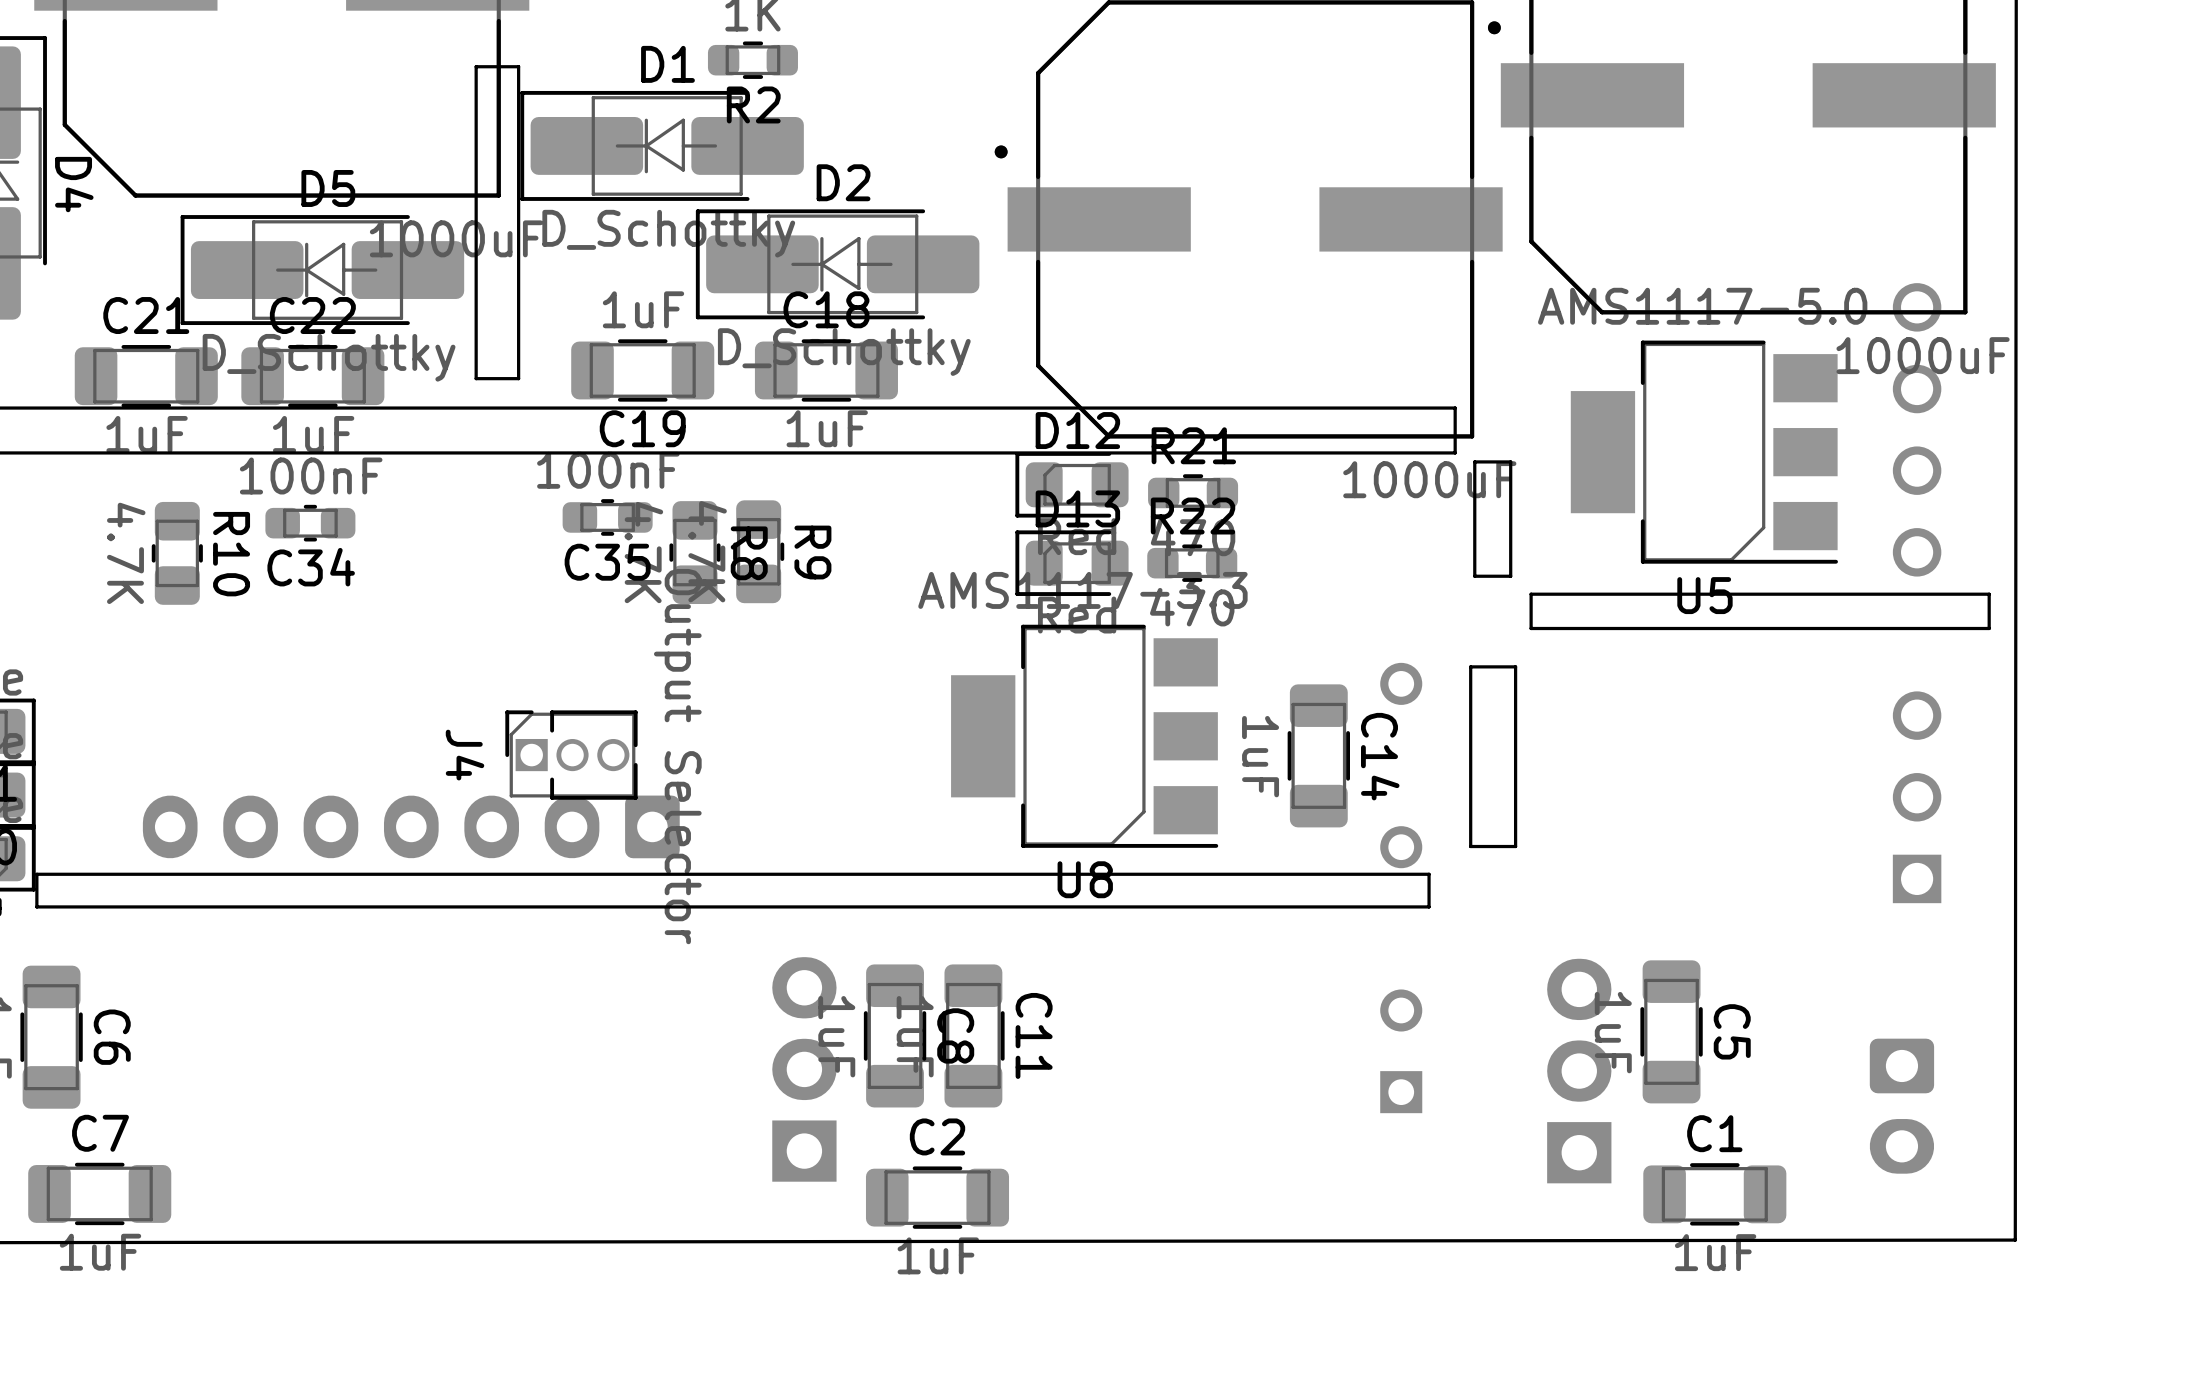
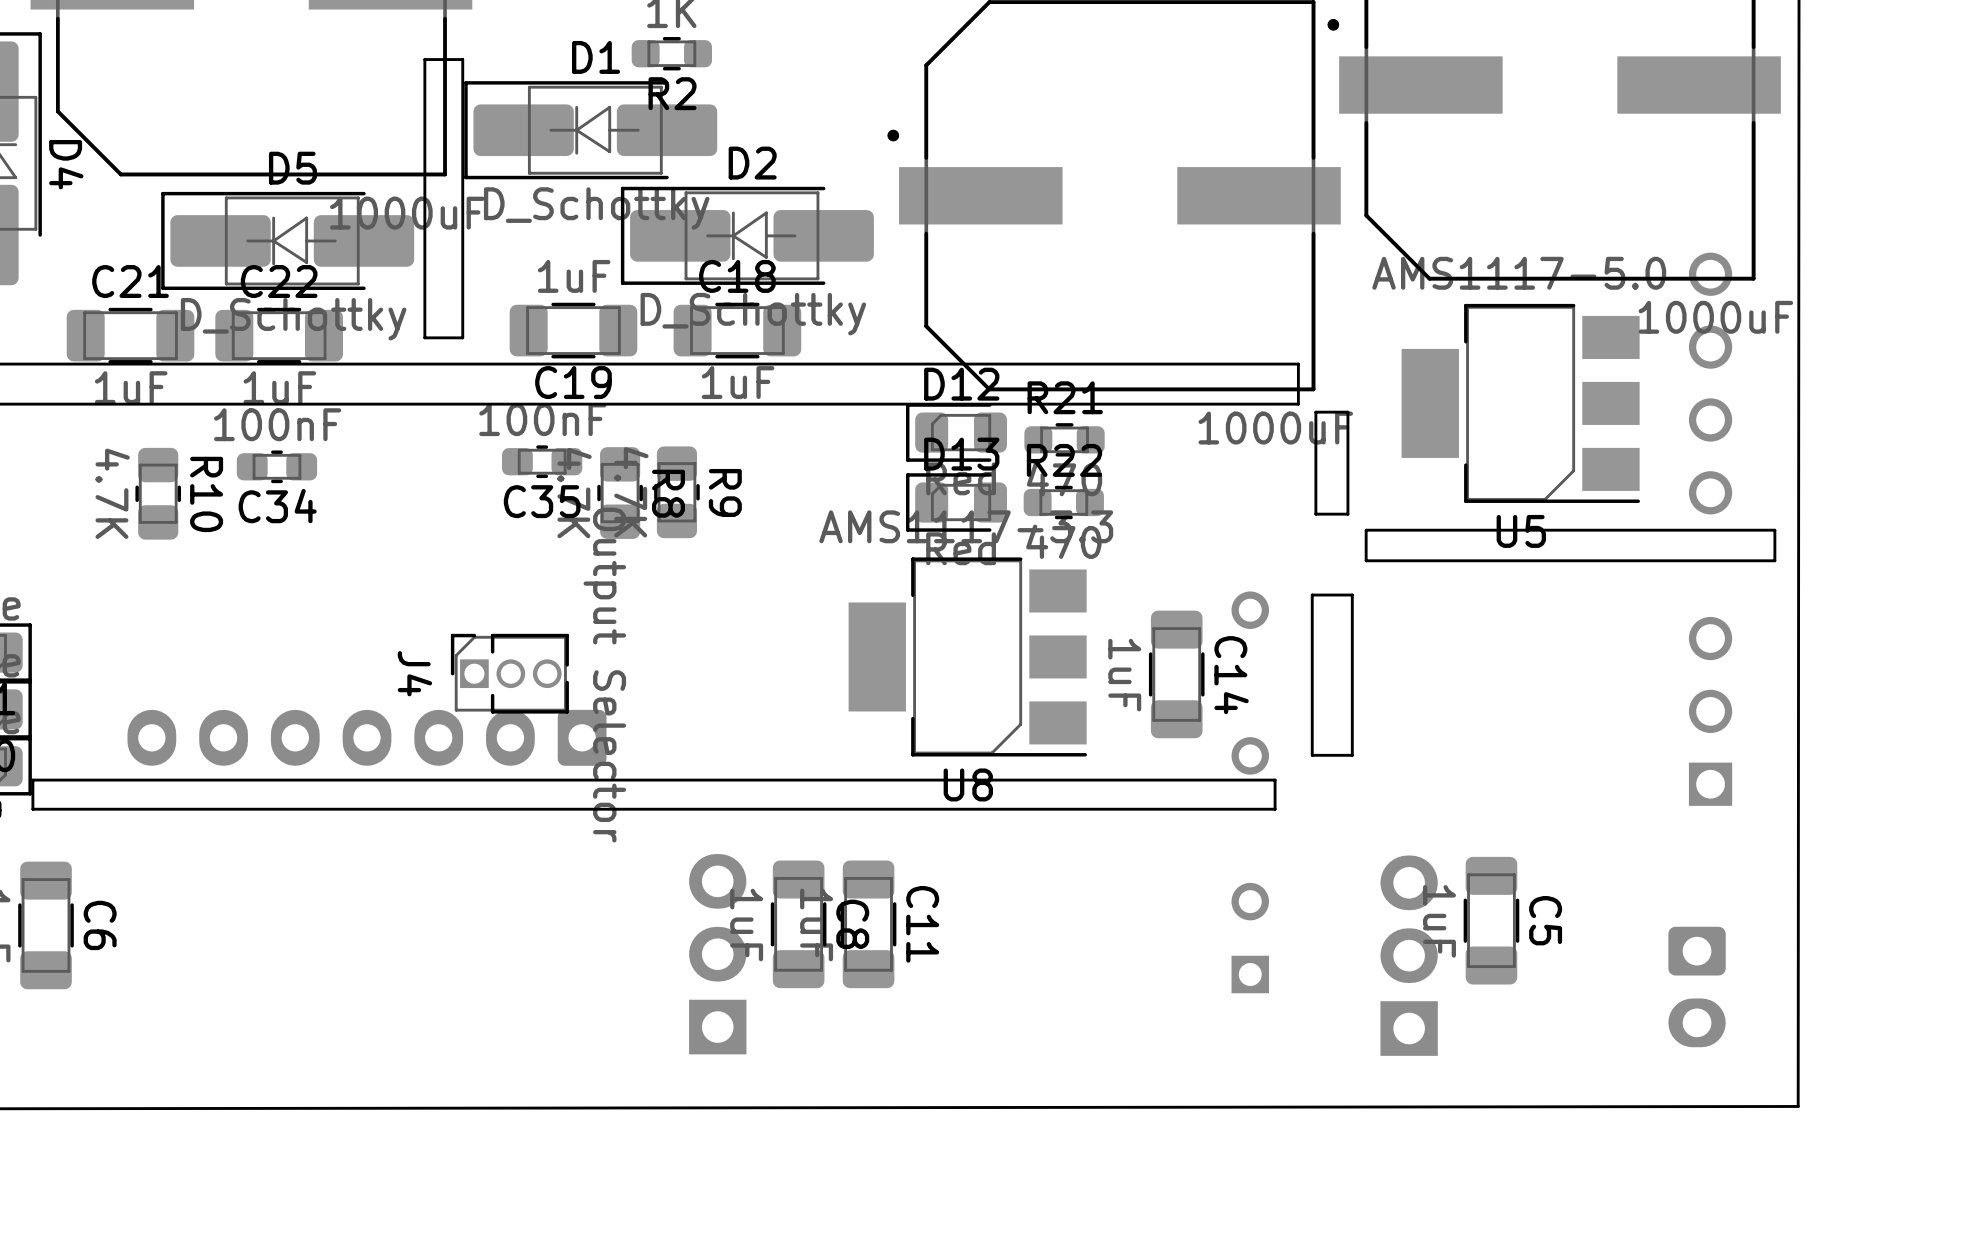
C7: 1uF (99, 1193) -> none
C1: 1uF (1714, 1194) -> none
C2: 1uF (937, 1197) -> none

